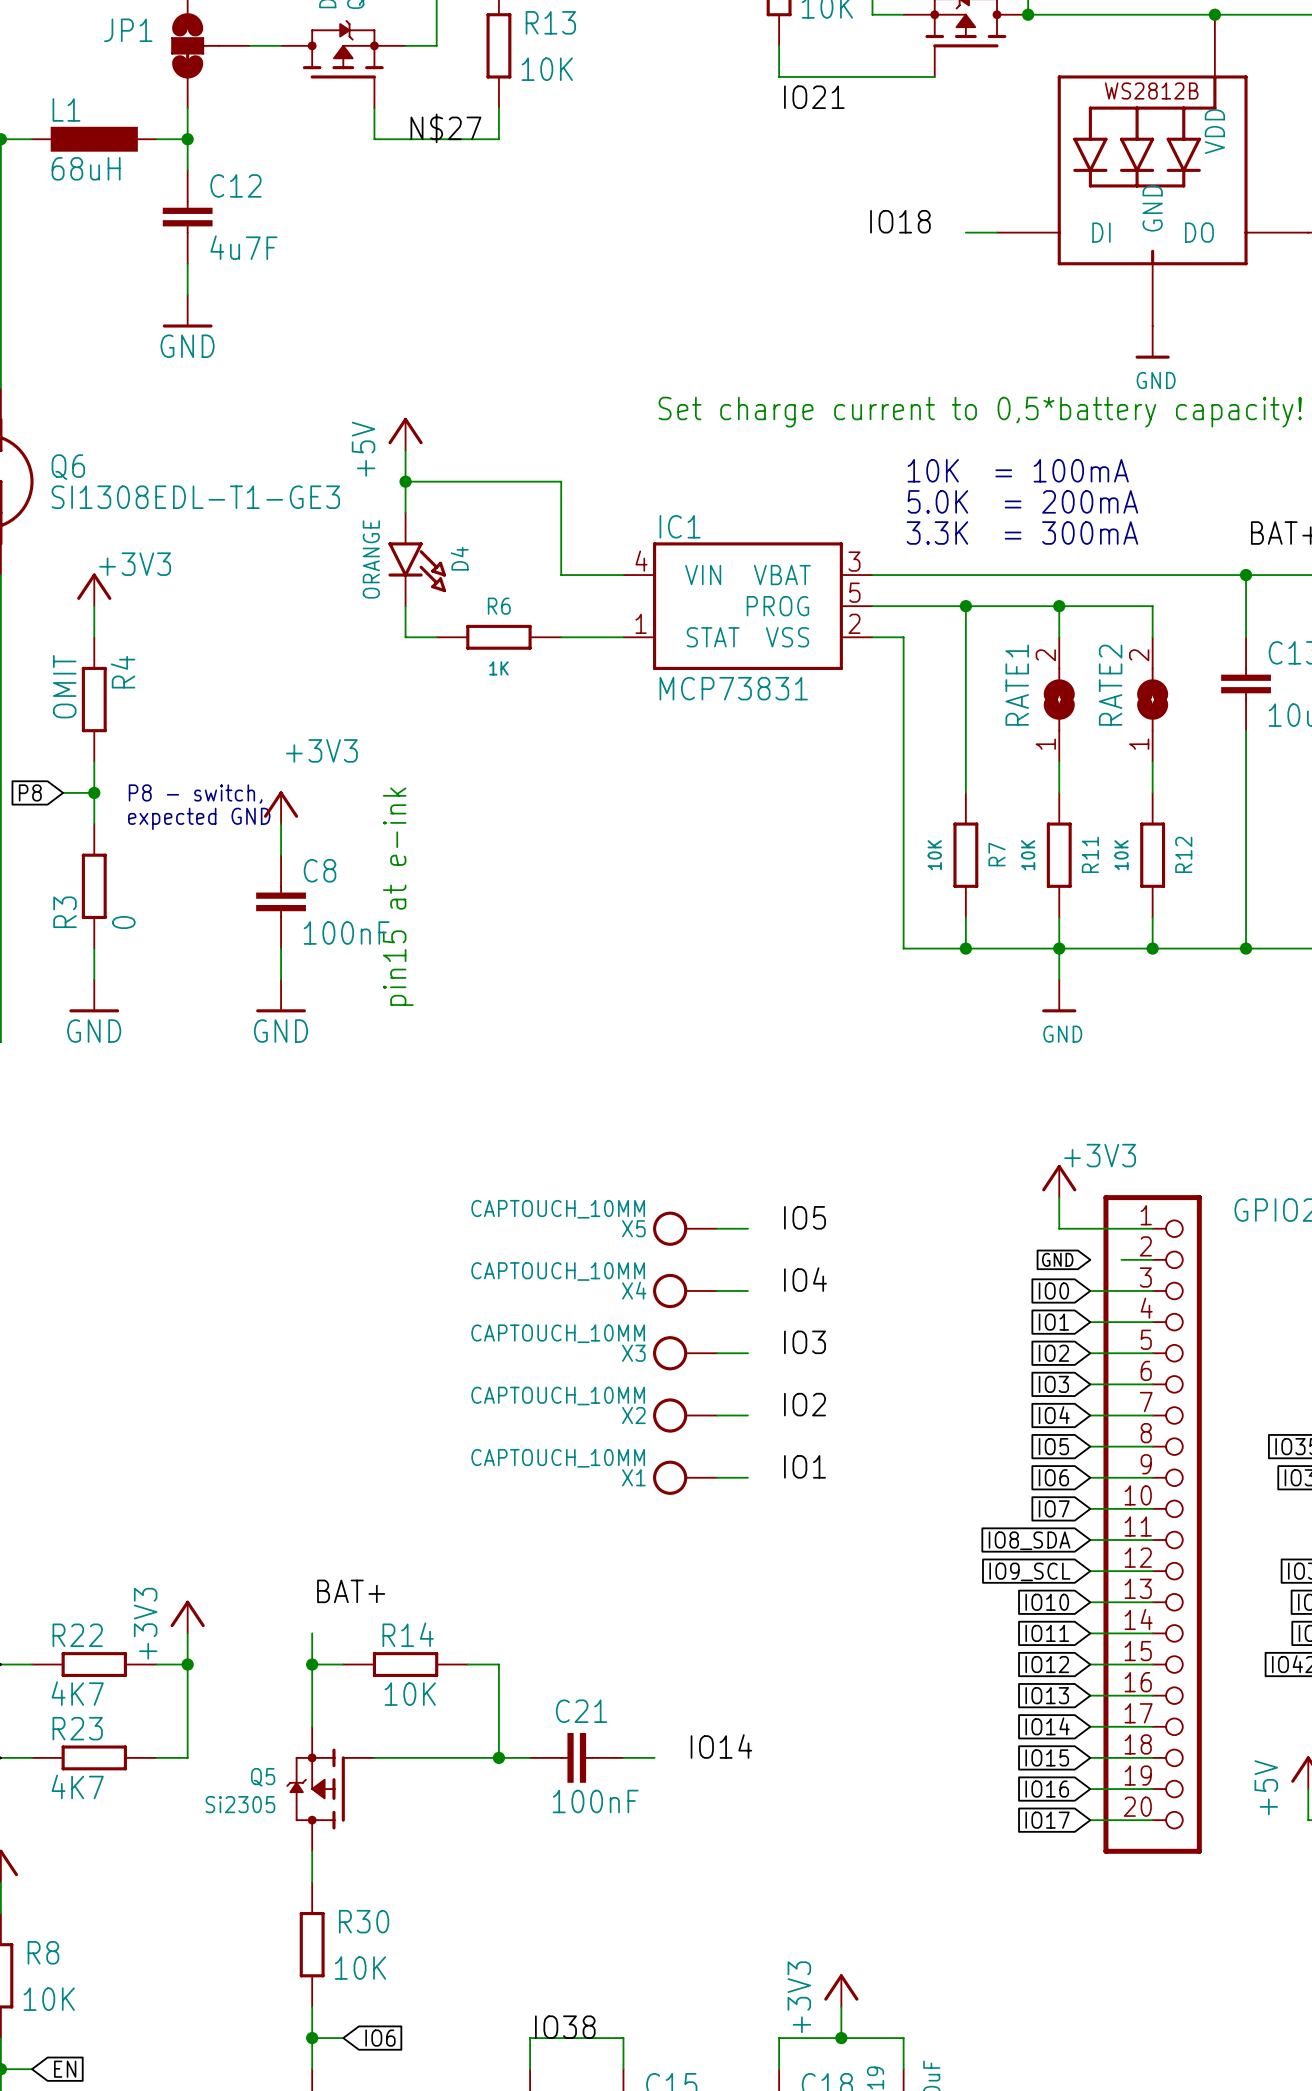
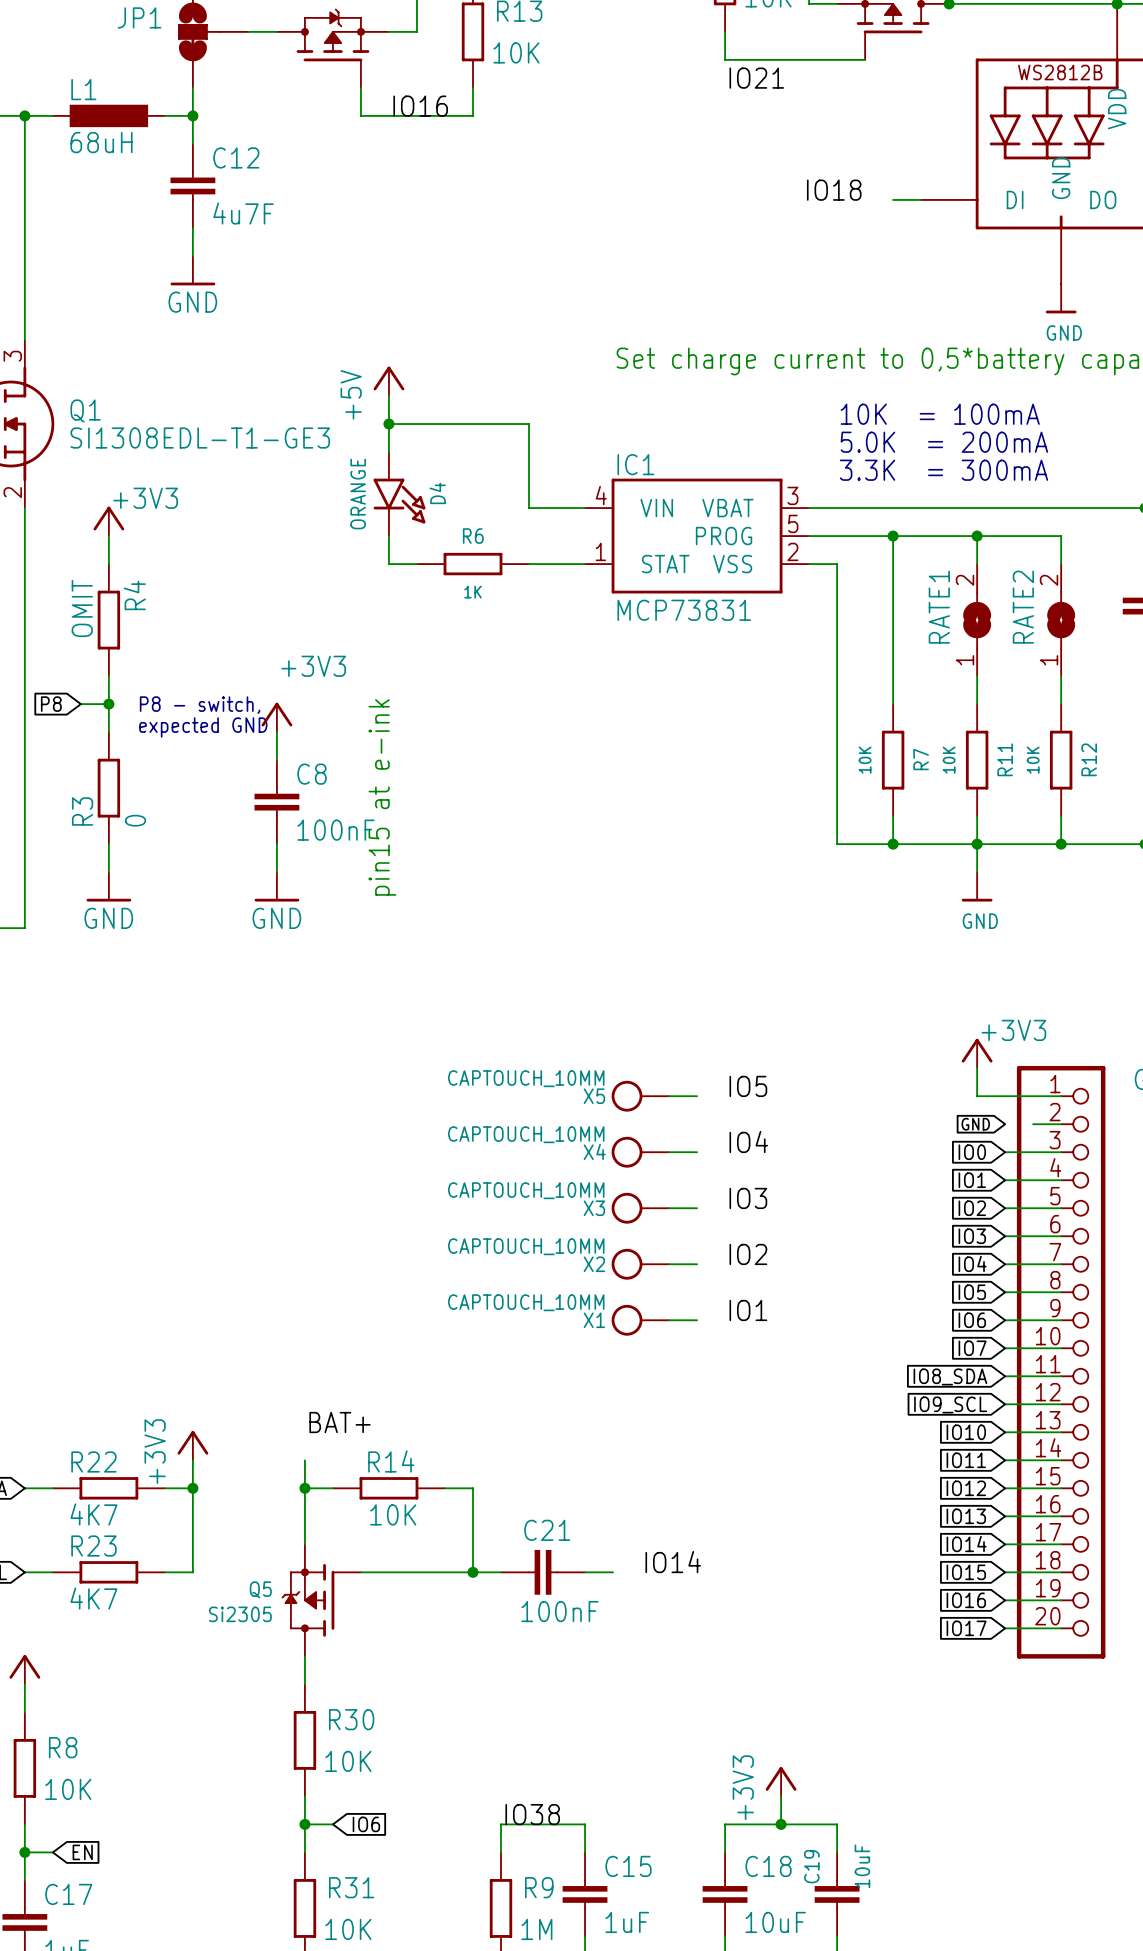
label: N$27 (445, 128) -> IO16 (420, 106)
Q6 name: Q6 (68, 467) -> Q1 (85, 410)

